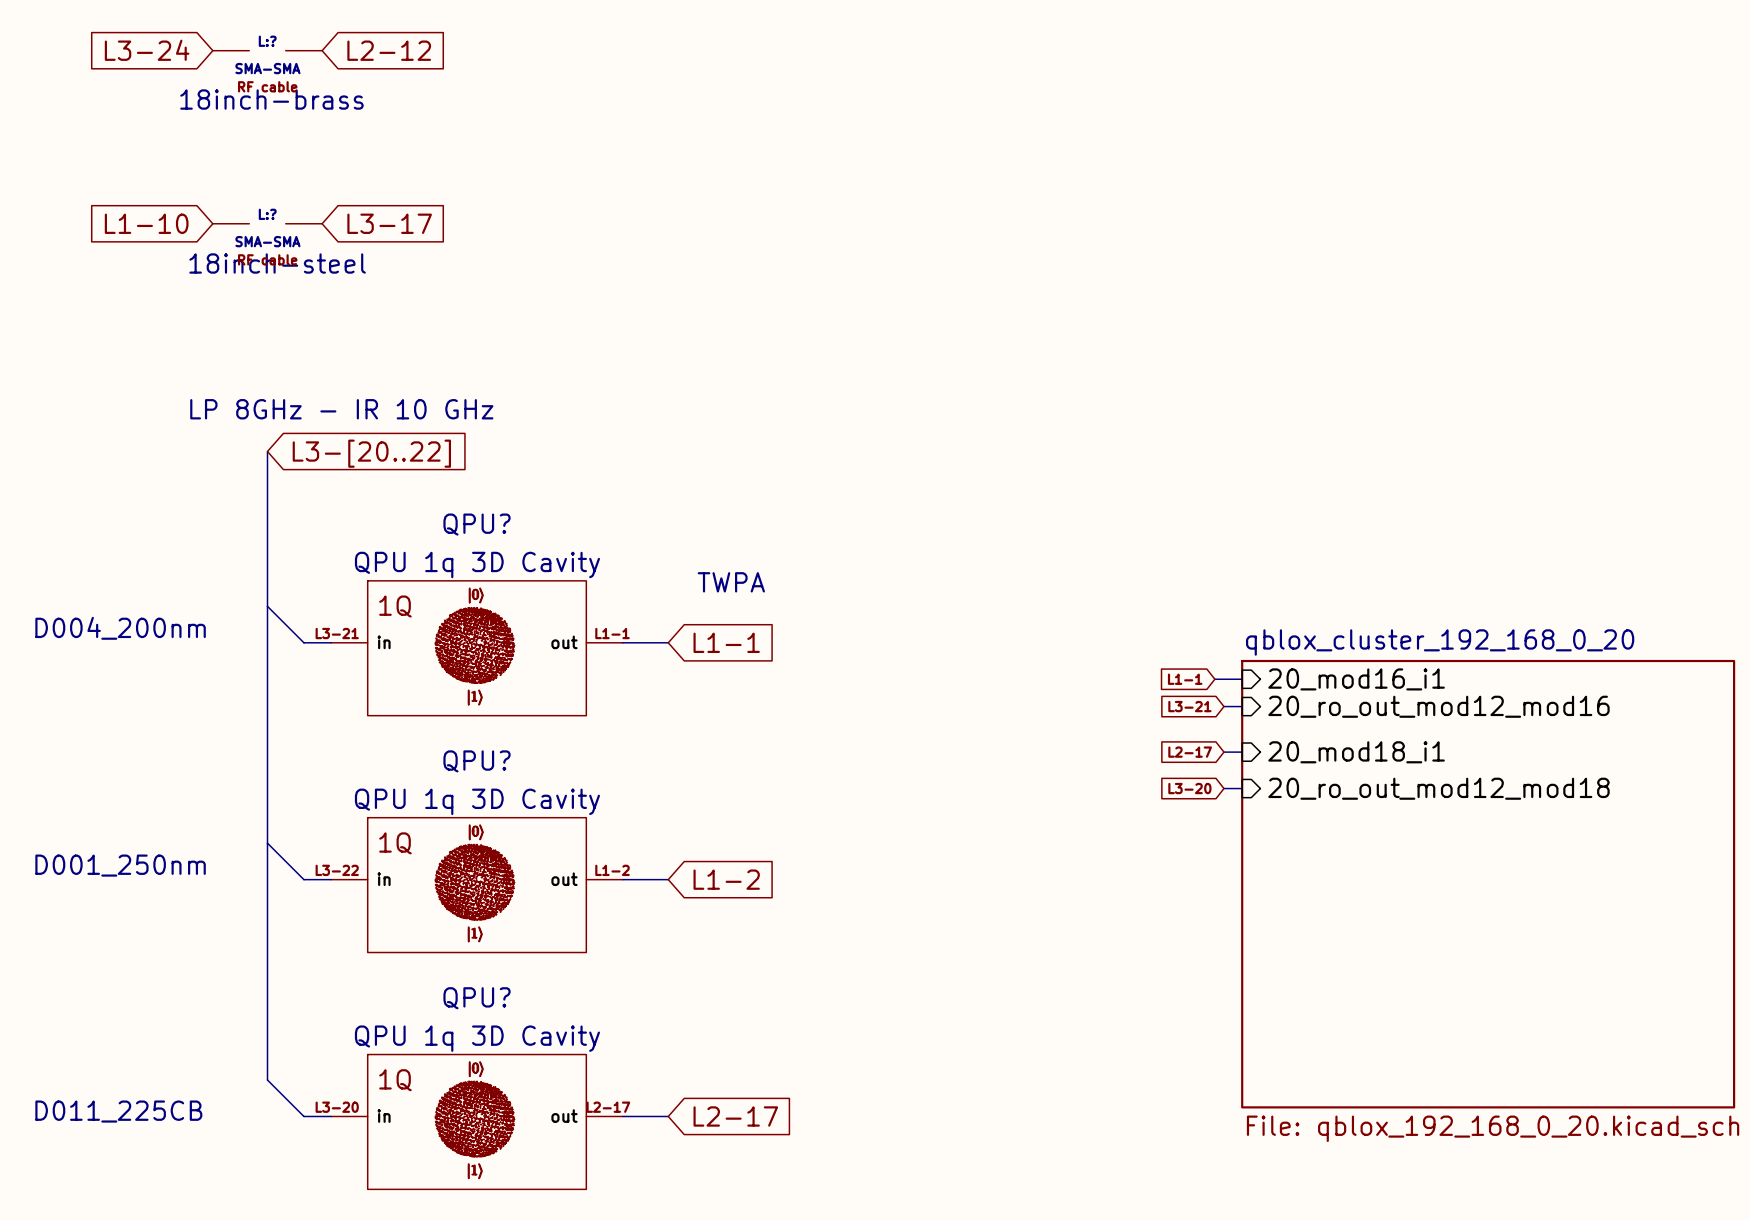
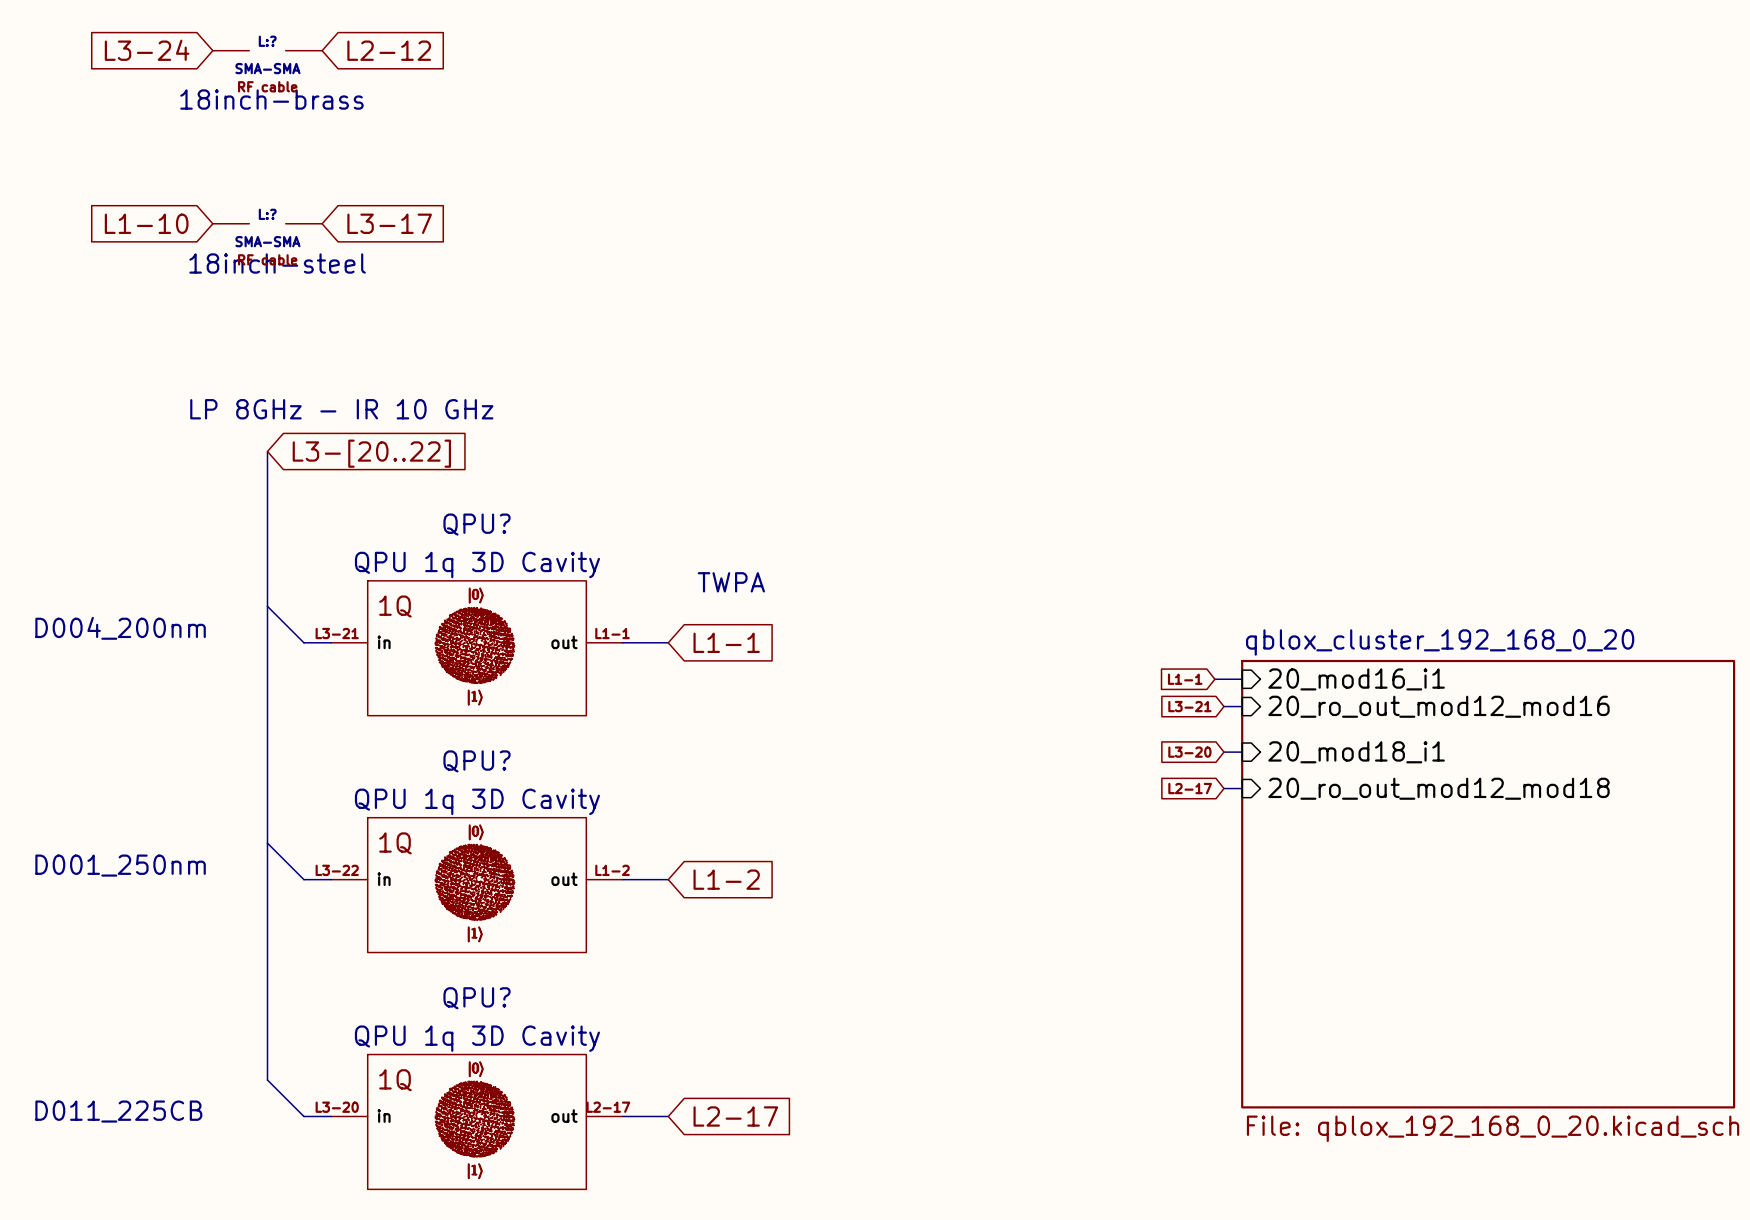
global label: L2-17 (1190, 752) -> L3-20 (1189, 752)
global label: L3-20 (1189, 788) -> L2-17 (1190, 788)

